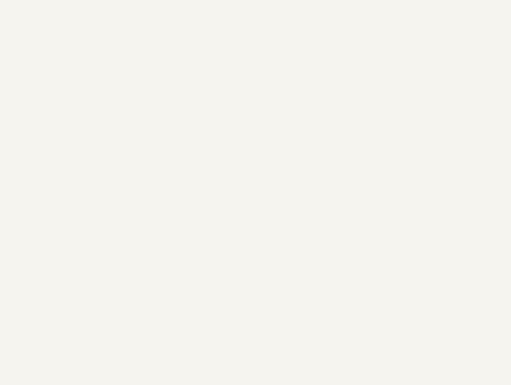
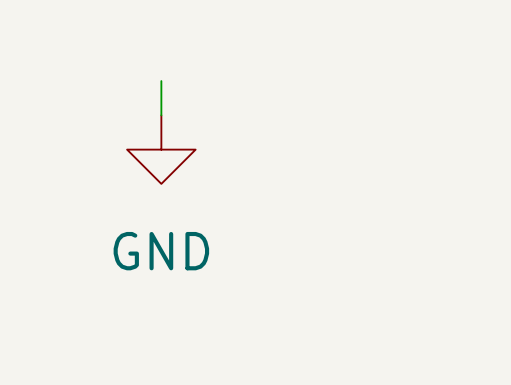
wire: none -> (161, 81) (161, 115)
power symbol: none -> GND (161, 149)

